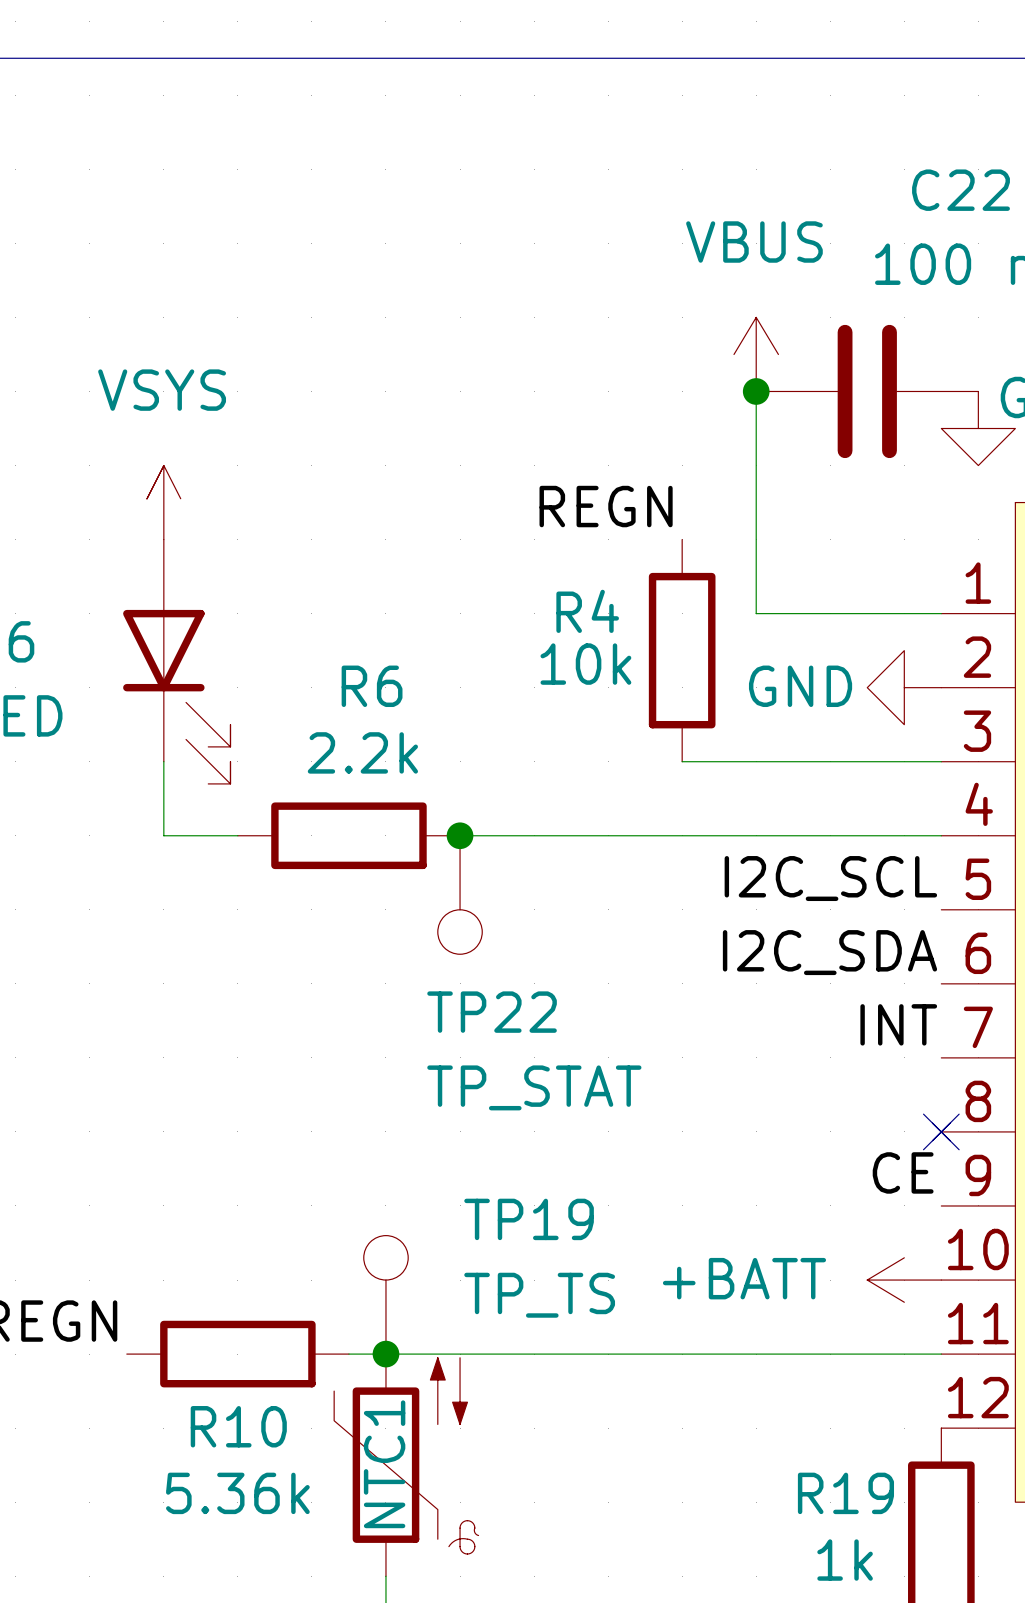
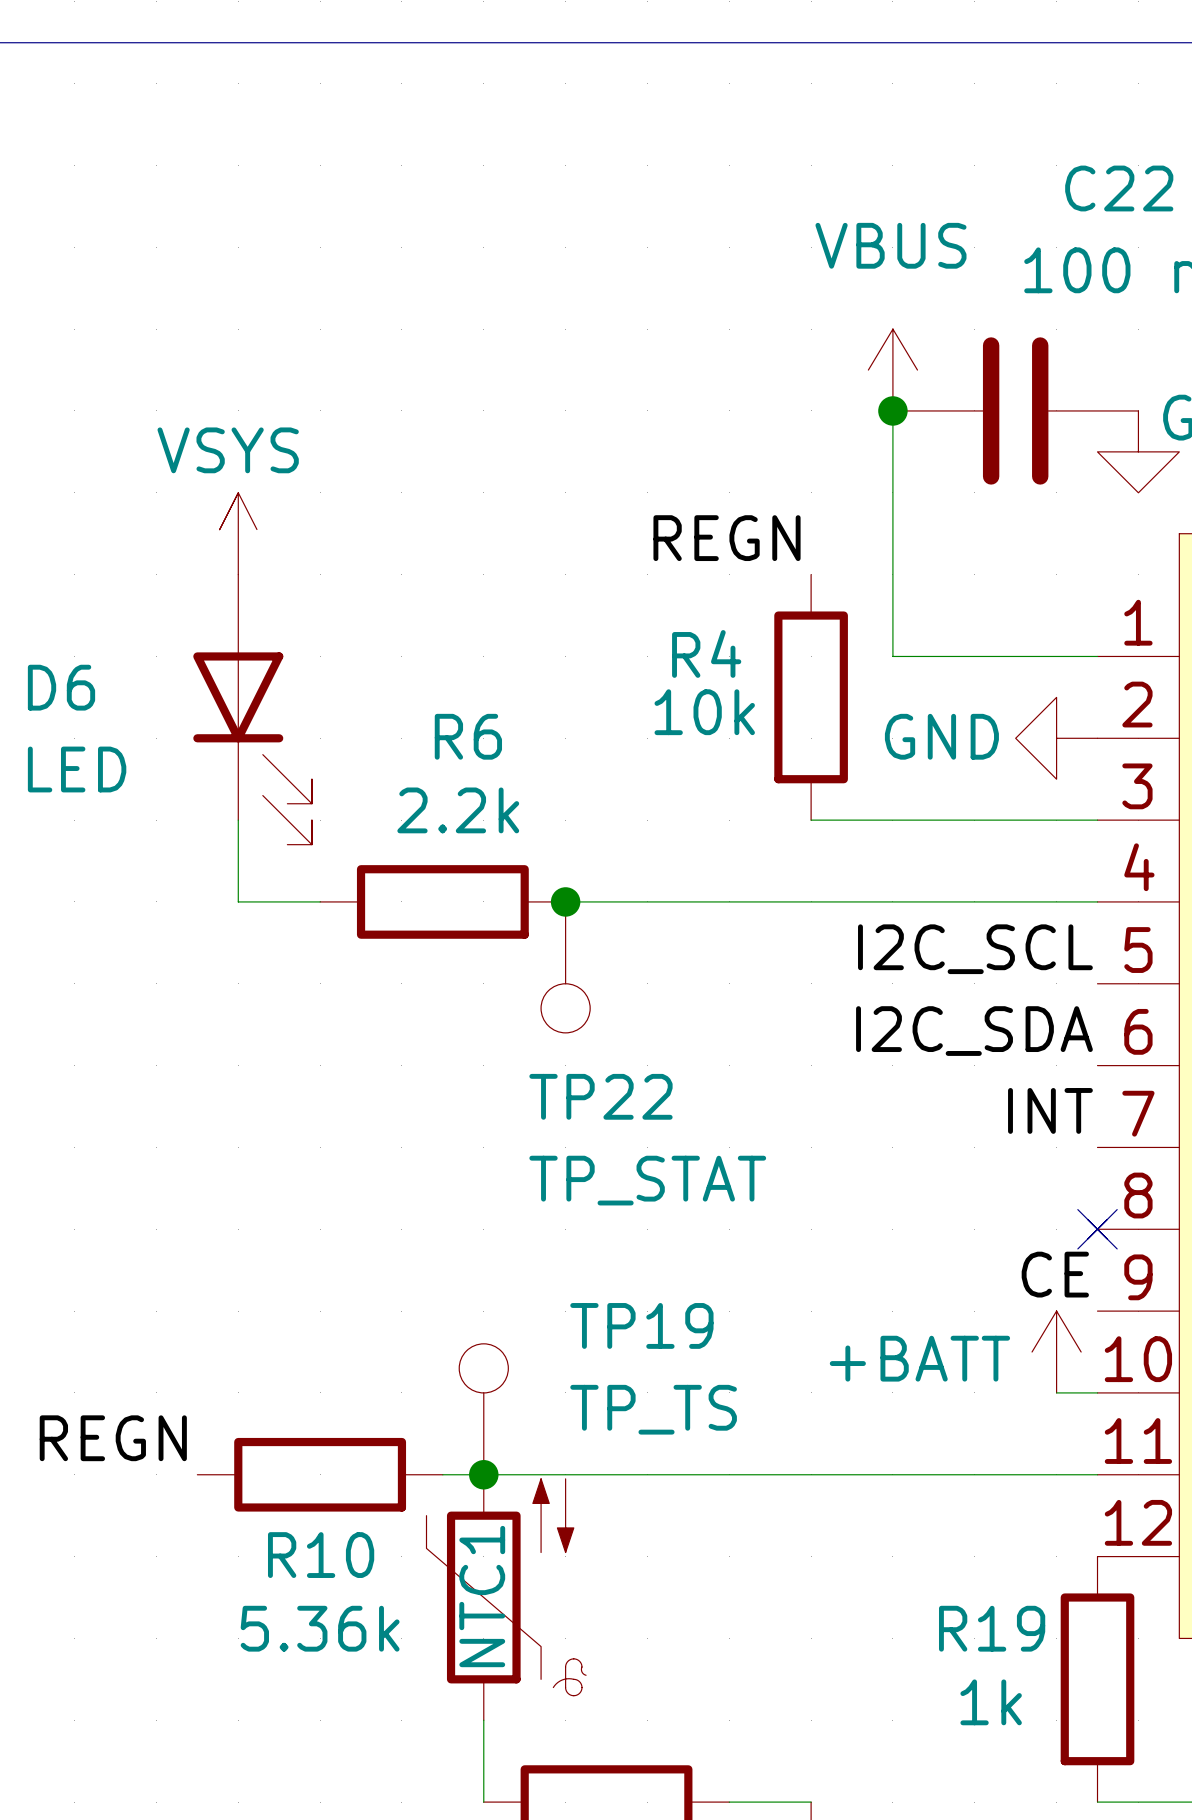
power symbol text position: VSYS (162, 390) -> VSYS (228, 450)
power symbol text position: +BATT (744, 1278) -> +BATT (919, 1358)
power symbol rotation: 0° (904, 1280) -> 90° clockwise (1056, 1352)

